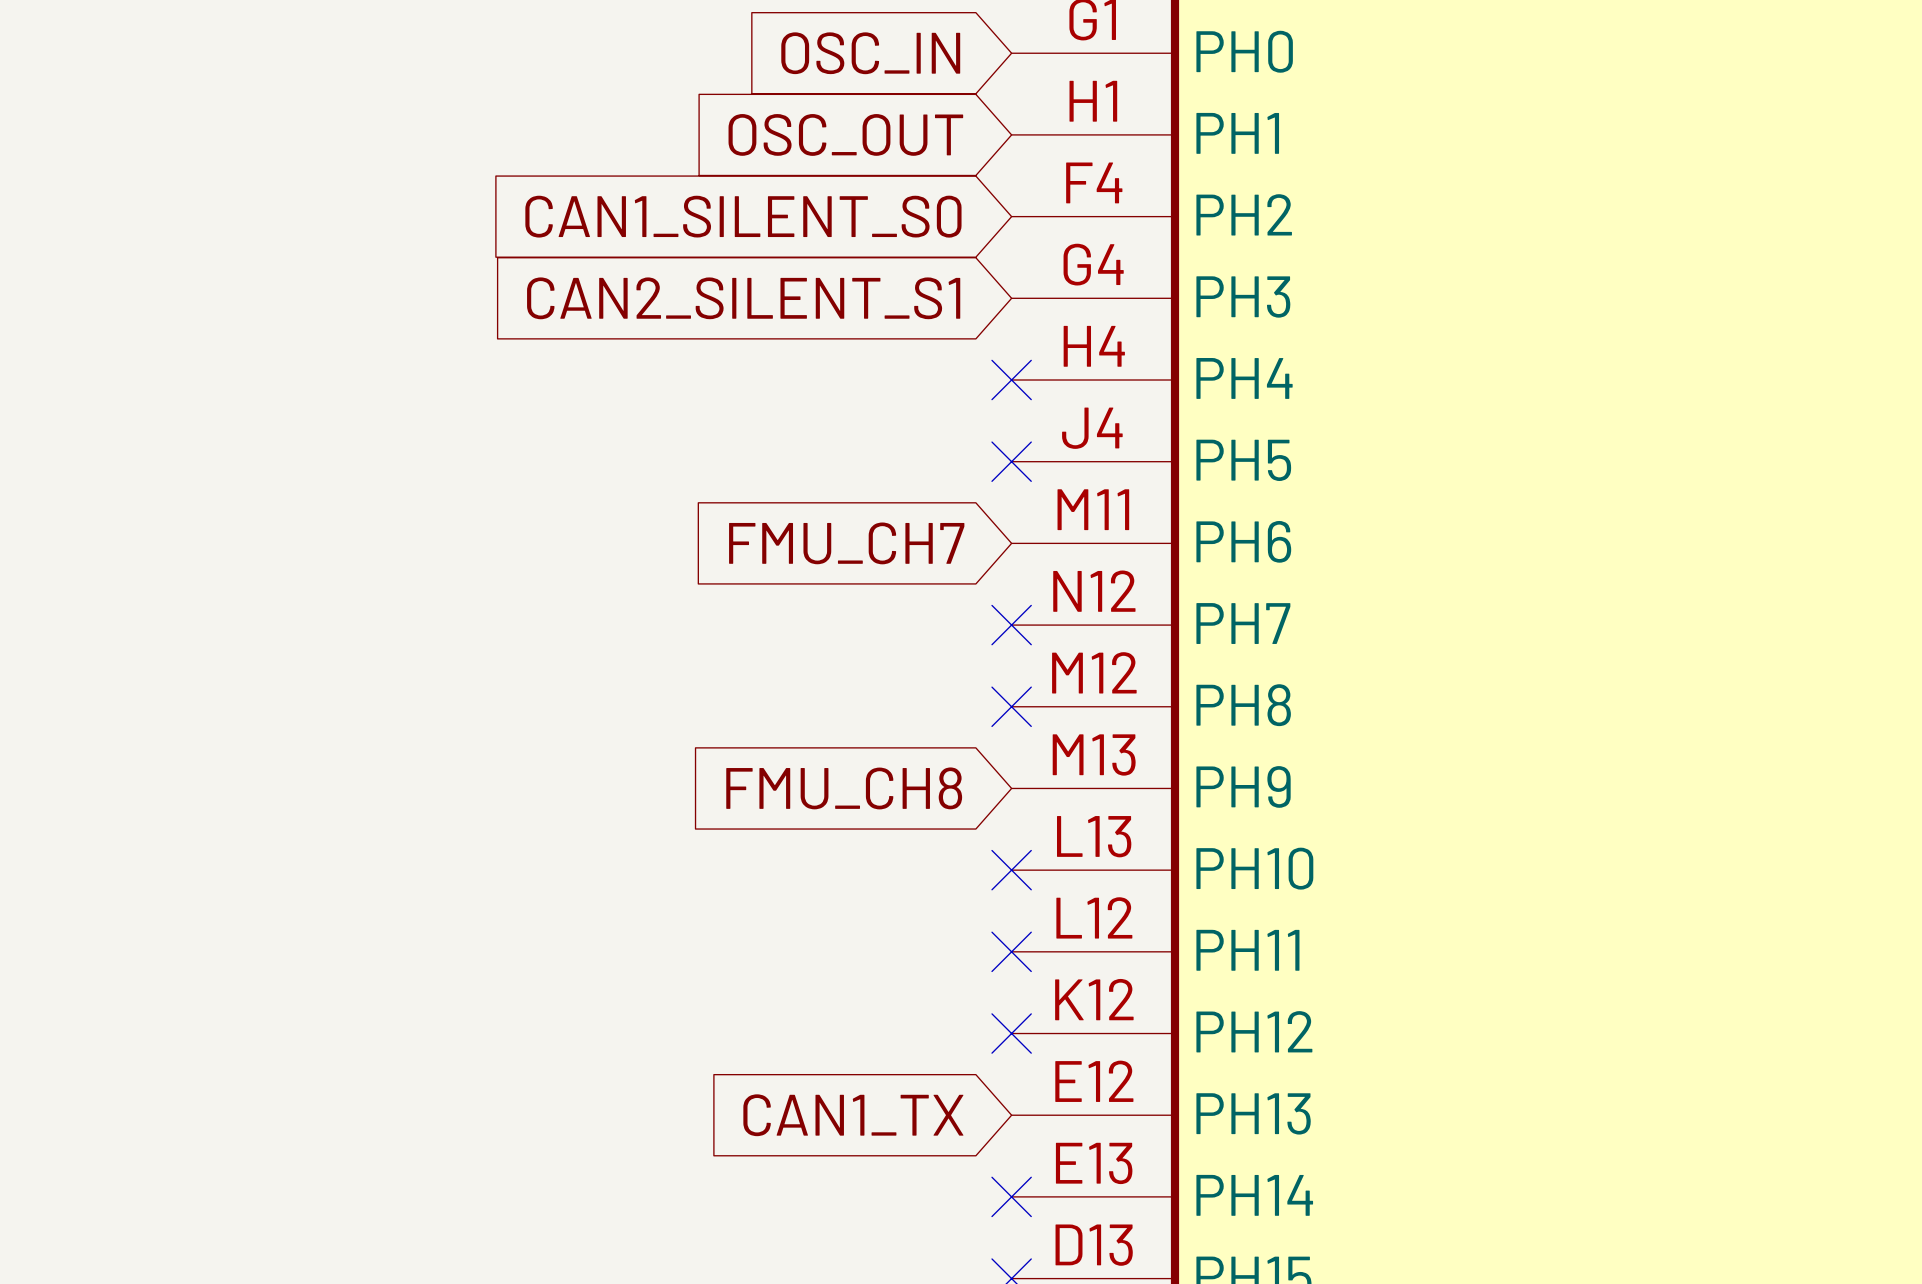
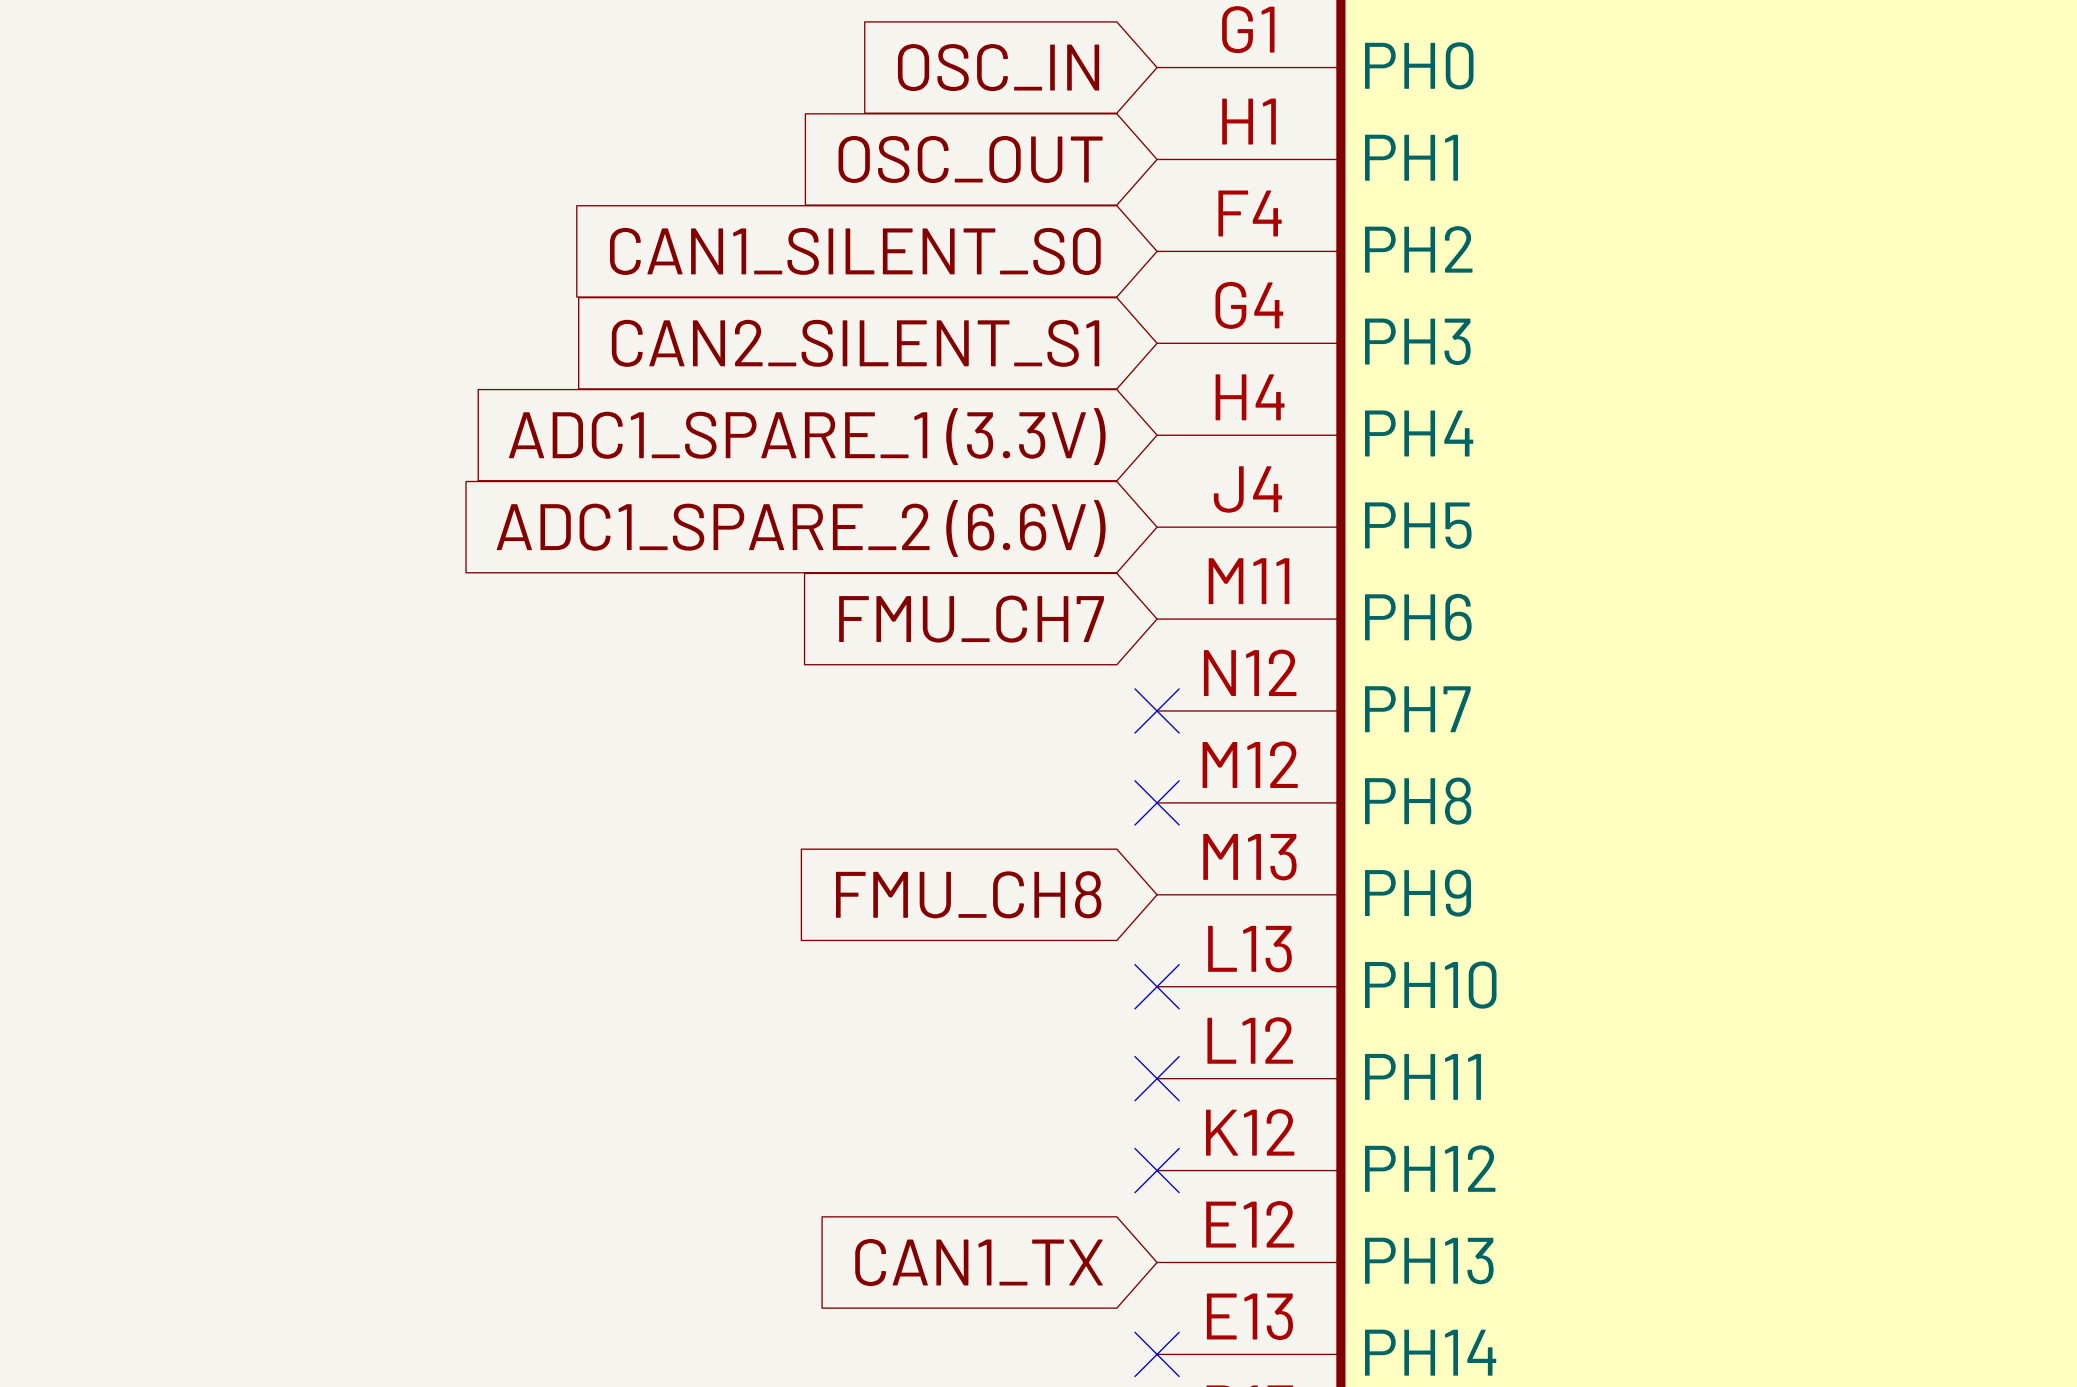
no-connect mark: (1011, 380) -> none
global label: none -> ADC1_SPARE_1 (3.3V) (807, 436)
no-connect mark: (1011, 461) -> none
global label: none -> ADC1_SPARE_2 (6.6V) (801, 528)

